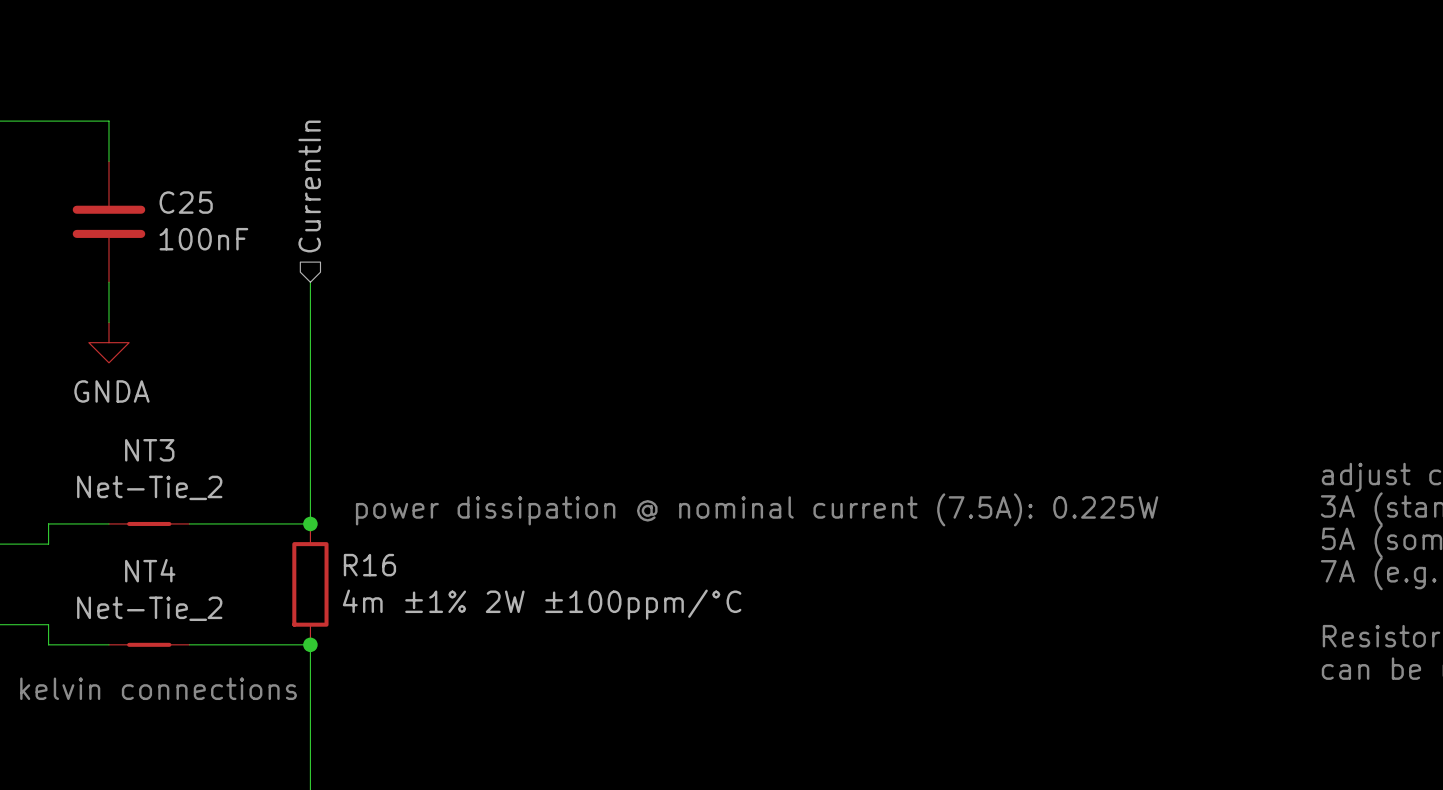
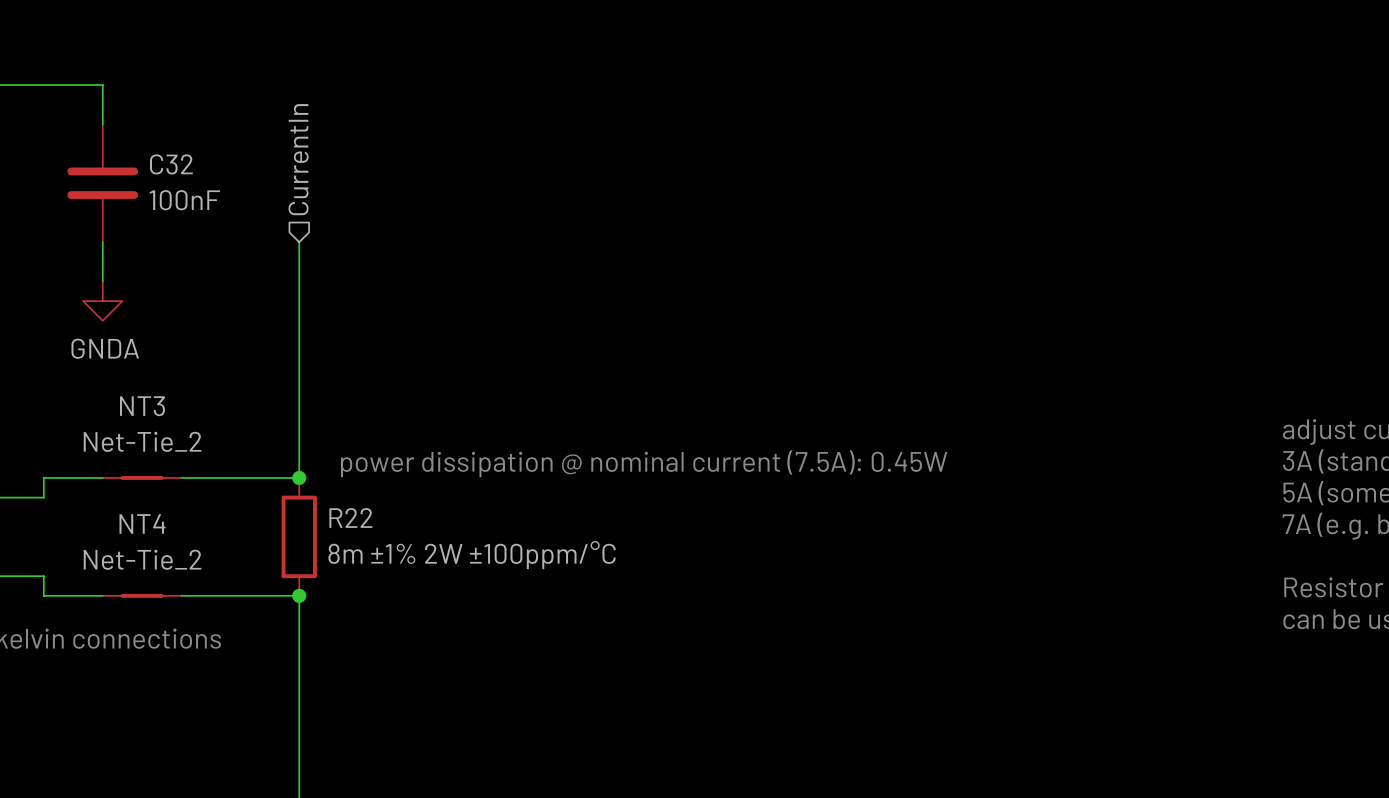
C25 name: C25 (186, 202) -> C32 (171, 164)
text: power dissipation @ nominal current (7.5A): 0.225W (757, 509) -> power dissipation @ nominal current (7.5A): 0.45W (644, 463)
R16 name: R16 (369, 565) -> R22 (350, 517)
R16 value: 4m ±1% 2W ±100ppm/°C (542, 604) -> 8m ±1% 2W ±100ppm/°C (472, 555)

